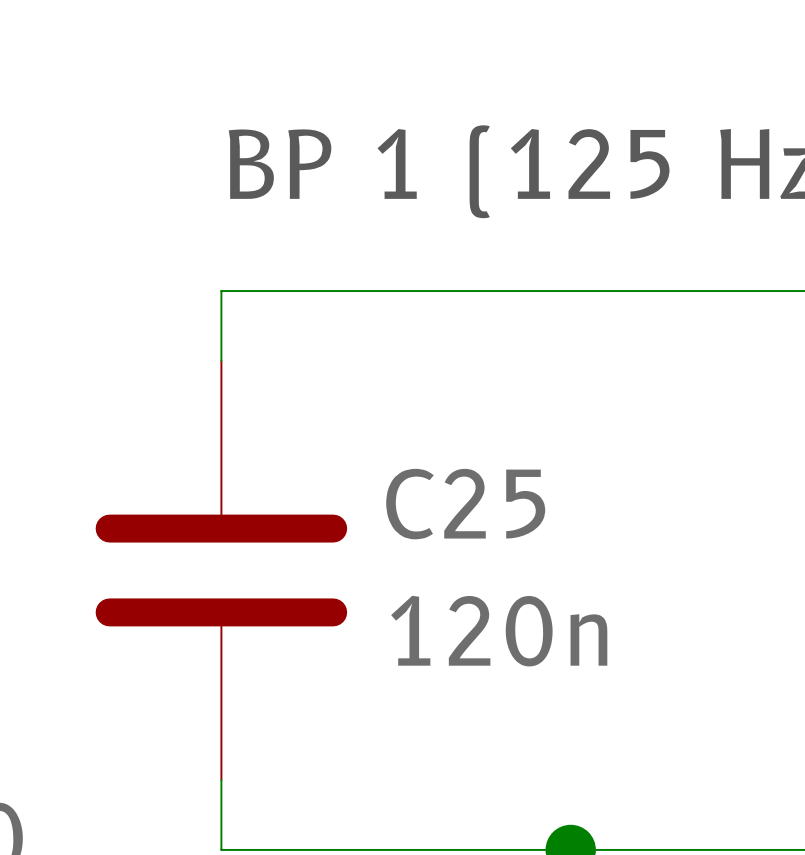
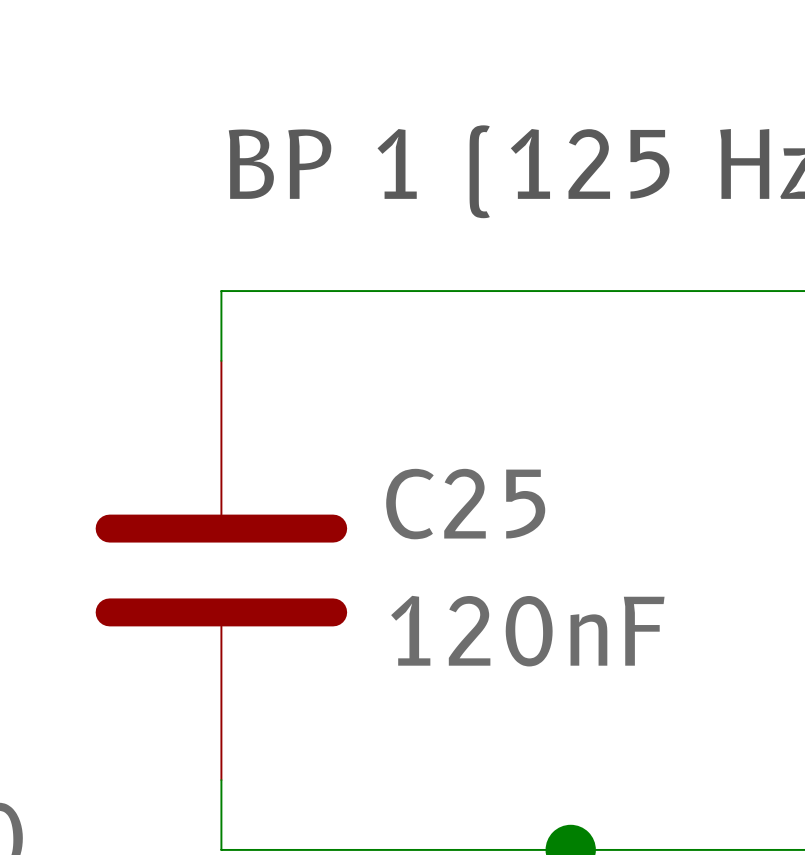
C25 value: 120n (499, 631) -> 120nF (527, 631)

